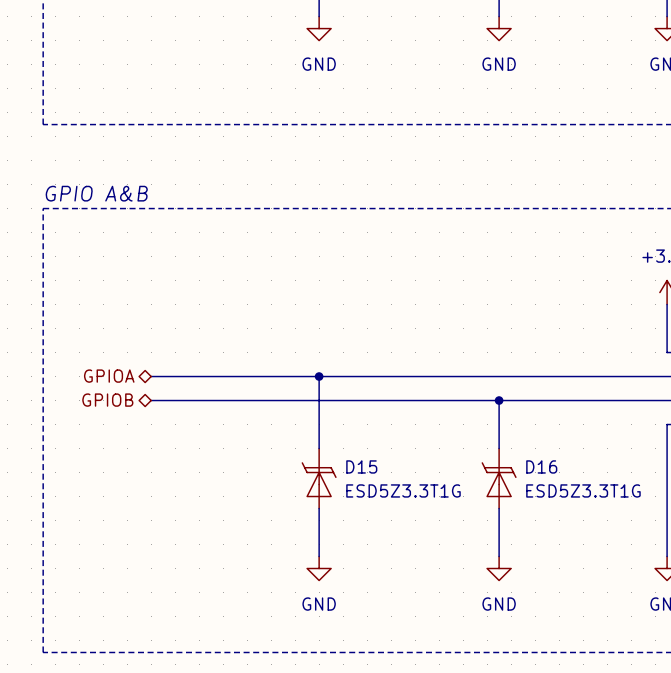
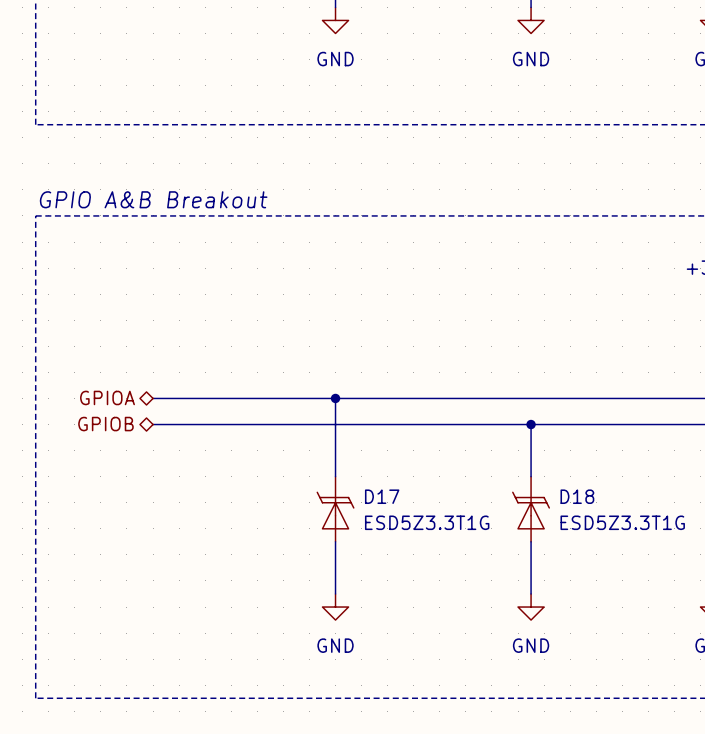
text: GPIO A&B (96, 193) -> GPIO A&B Breakout (153, 199)
D15 name: D15 (361, 466) -> D17 (382, 496)
D16 name: D16 (541, 466) -> D18 (577, 496)

